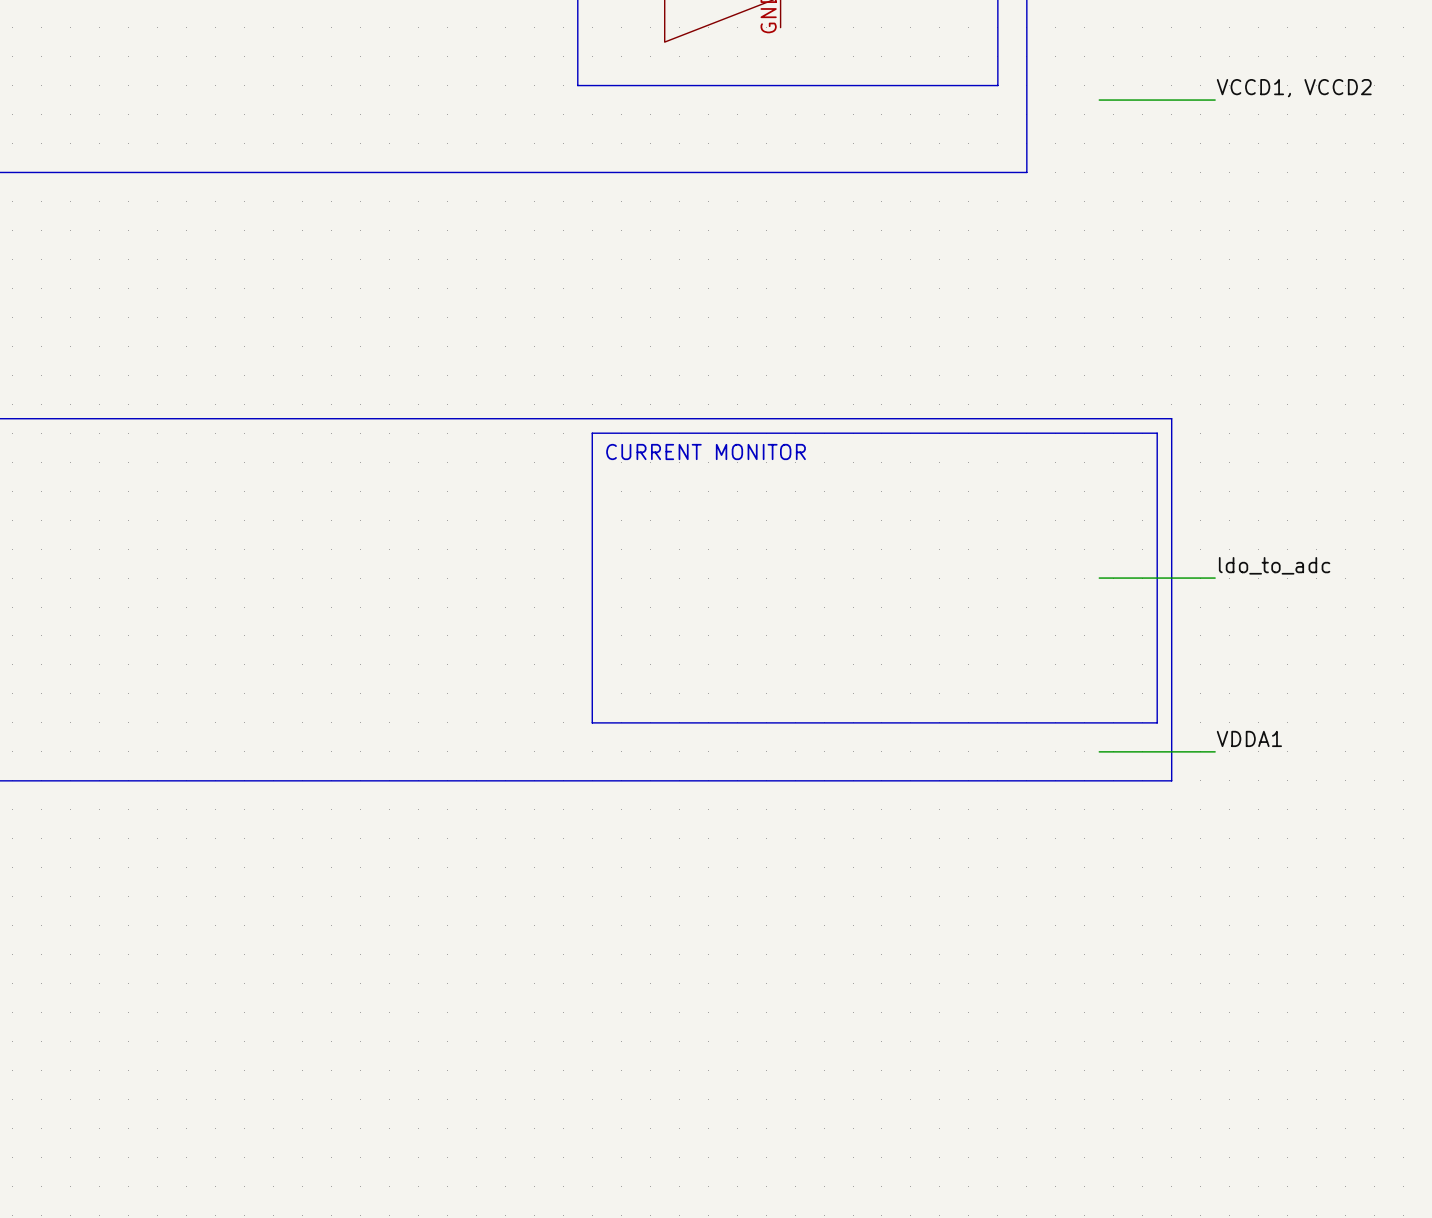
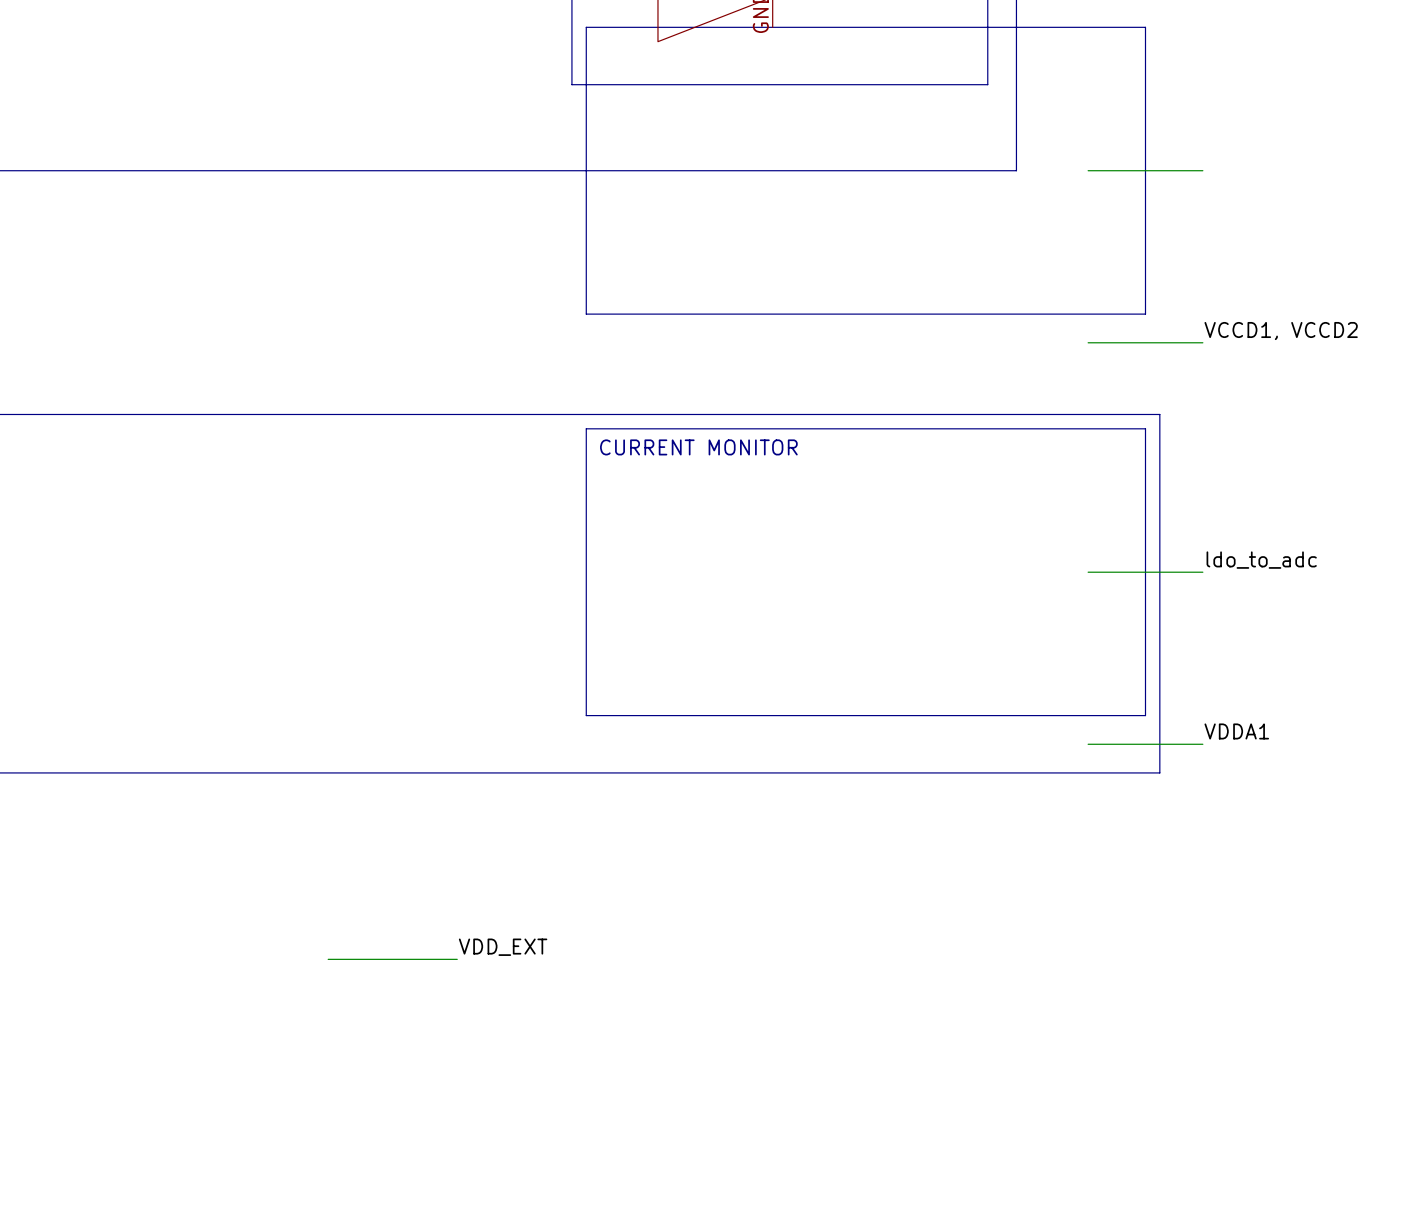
line: none -> (586, 27) (1145, 27) (1145, 314) (586, 314) (586, 27)
label position: VCCD1, VCCD2 (1294, 88) -> VCCD1, VCCD2 (1281, 331)
wire: (1099, 100) (1215, 100) -> (1088, 170) (1202, 170)
wire: none -> (1088, 342) (1202, 342)
label: none -> VDD_EXT (503, 947)
wire: none -> (328, 959) (457, 959)

